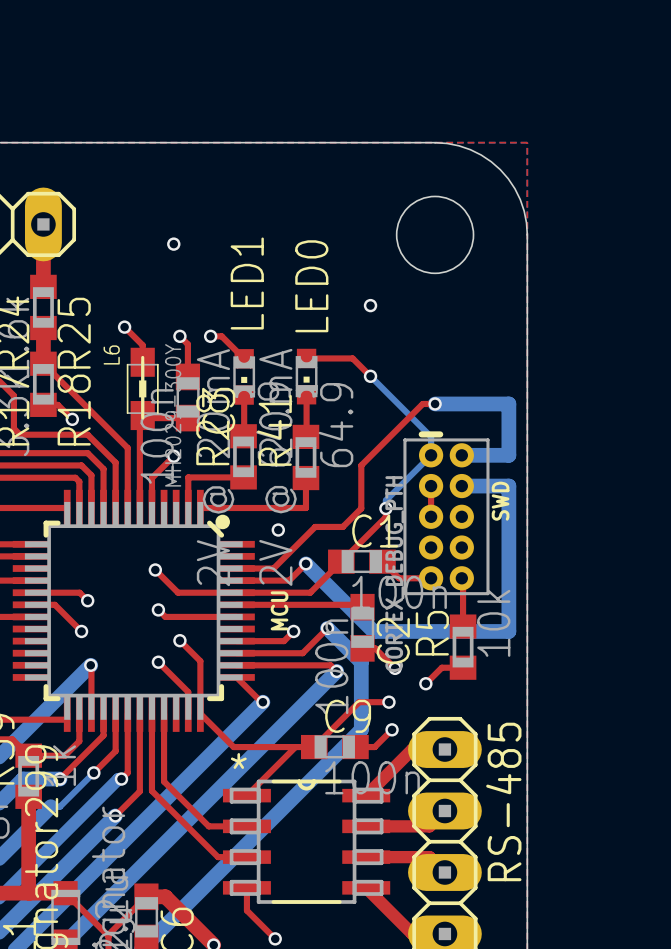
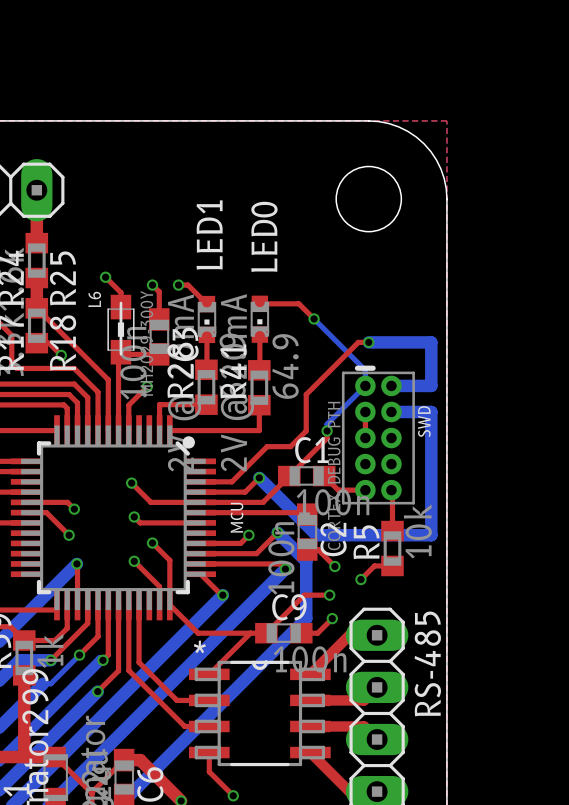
via: (173, 244) -> none
via: (370, 305) -> none
via: (278, 530) -> none

